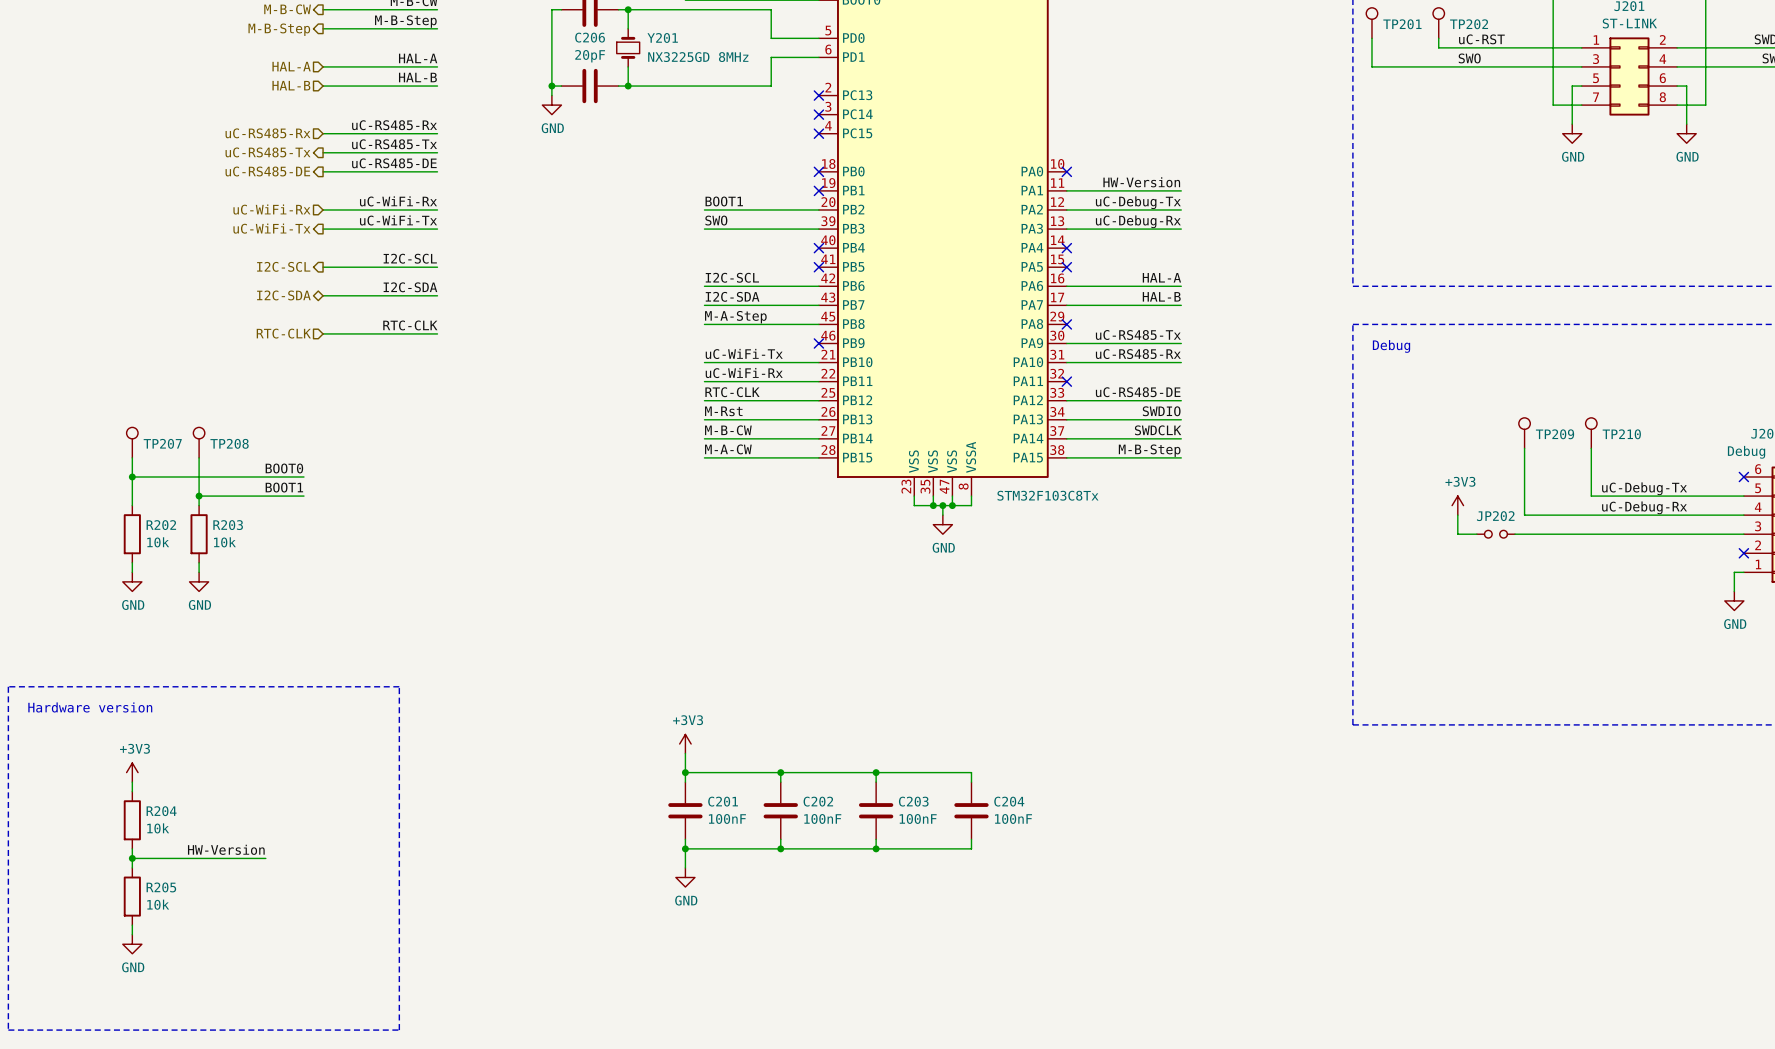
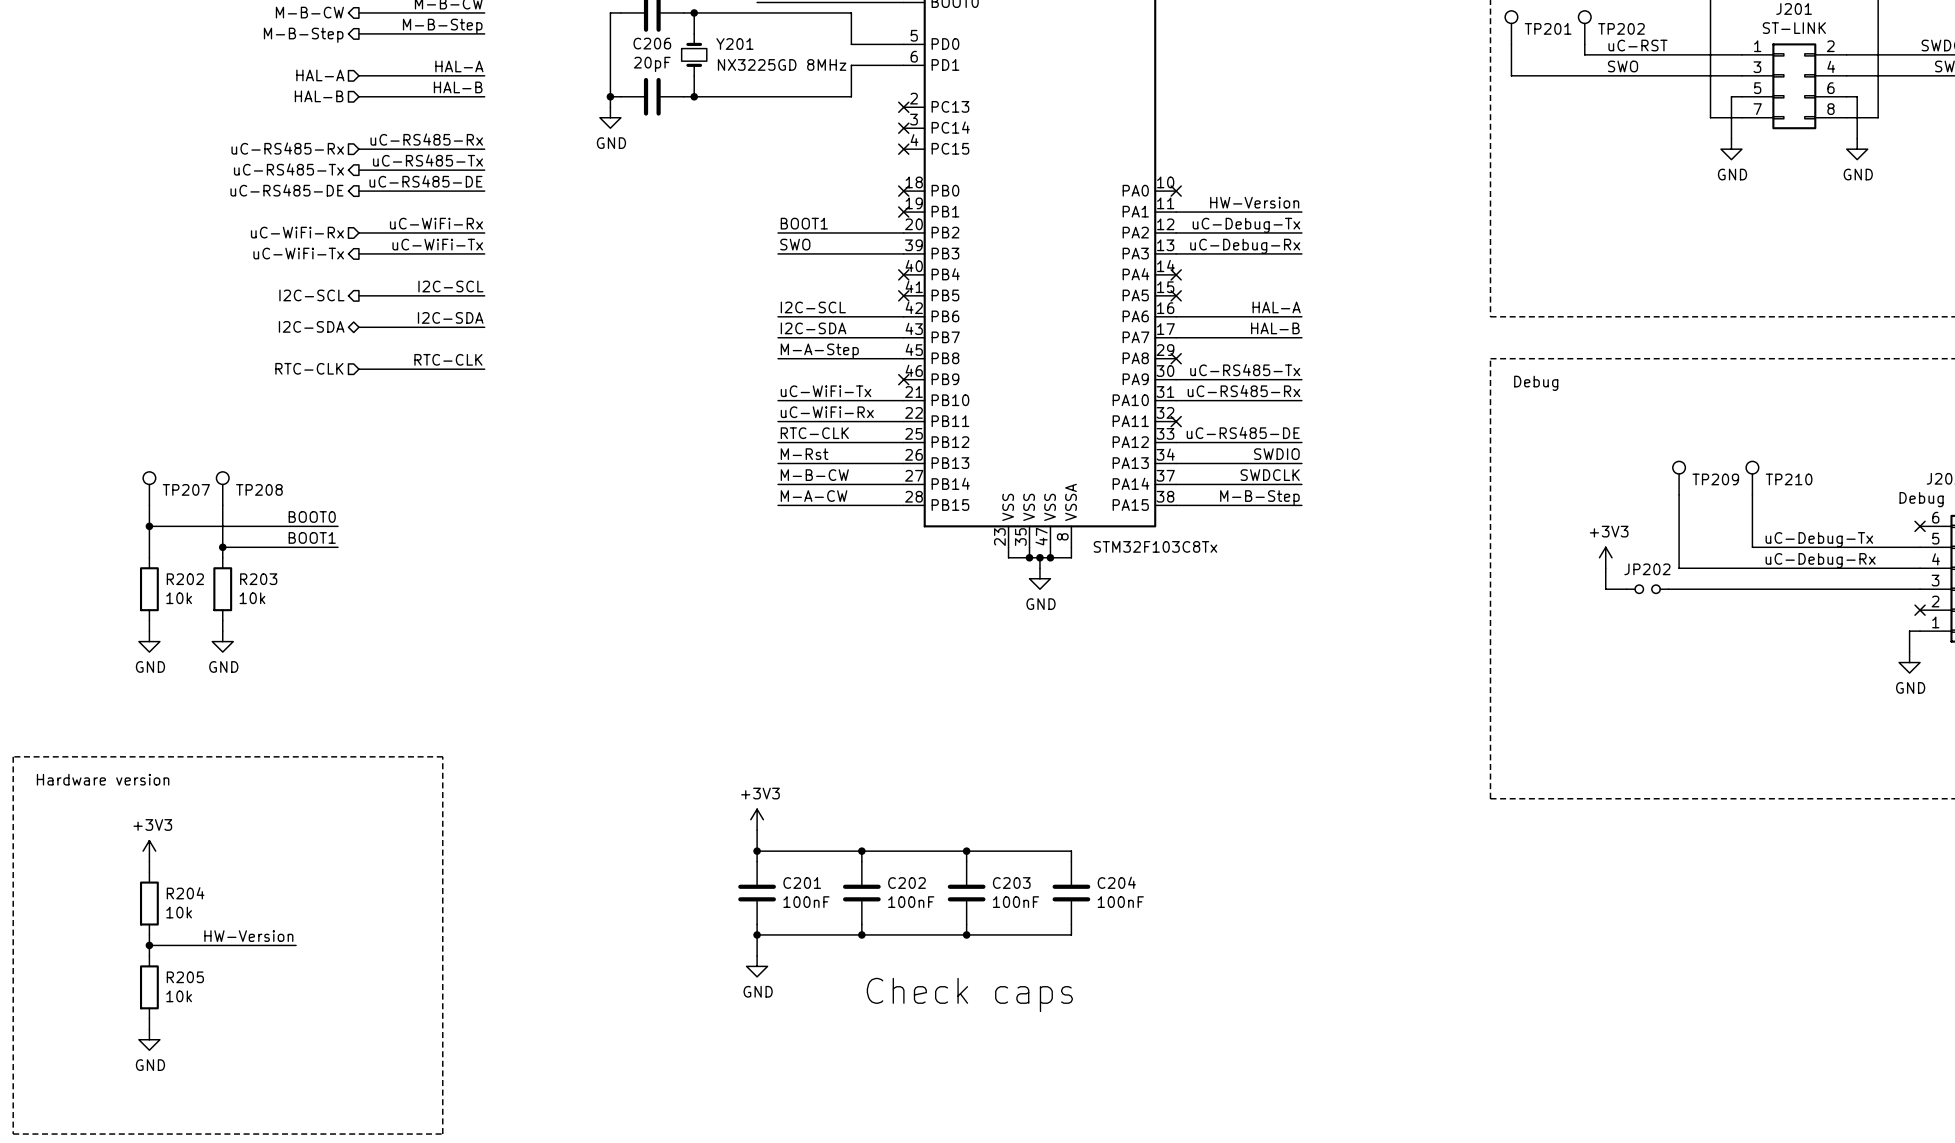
text: none -> Check caps (969, 994)

